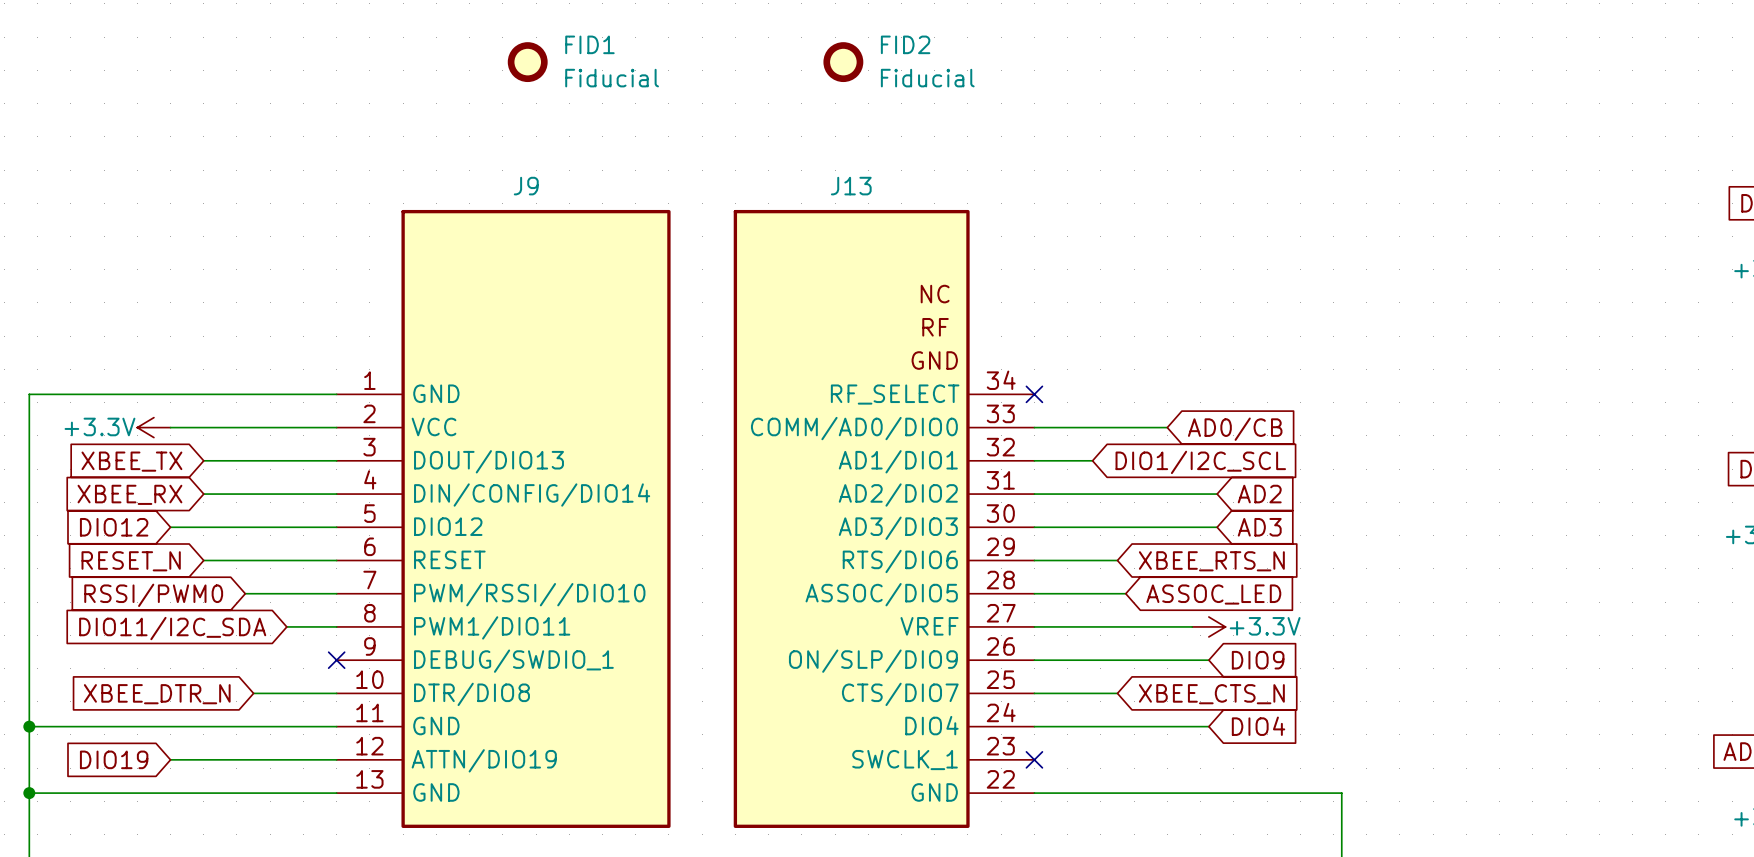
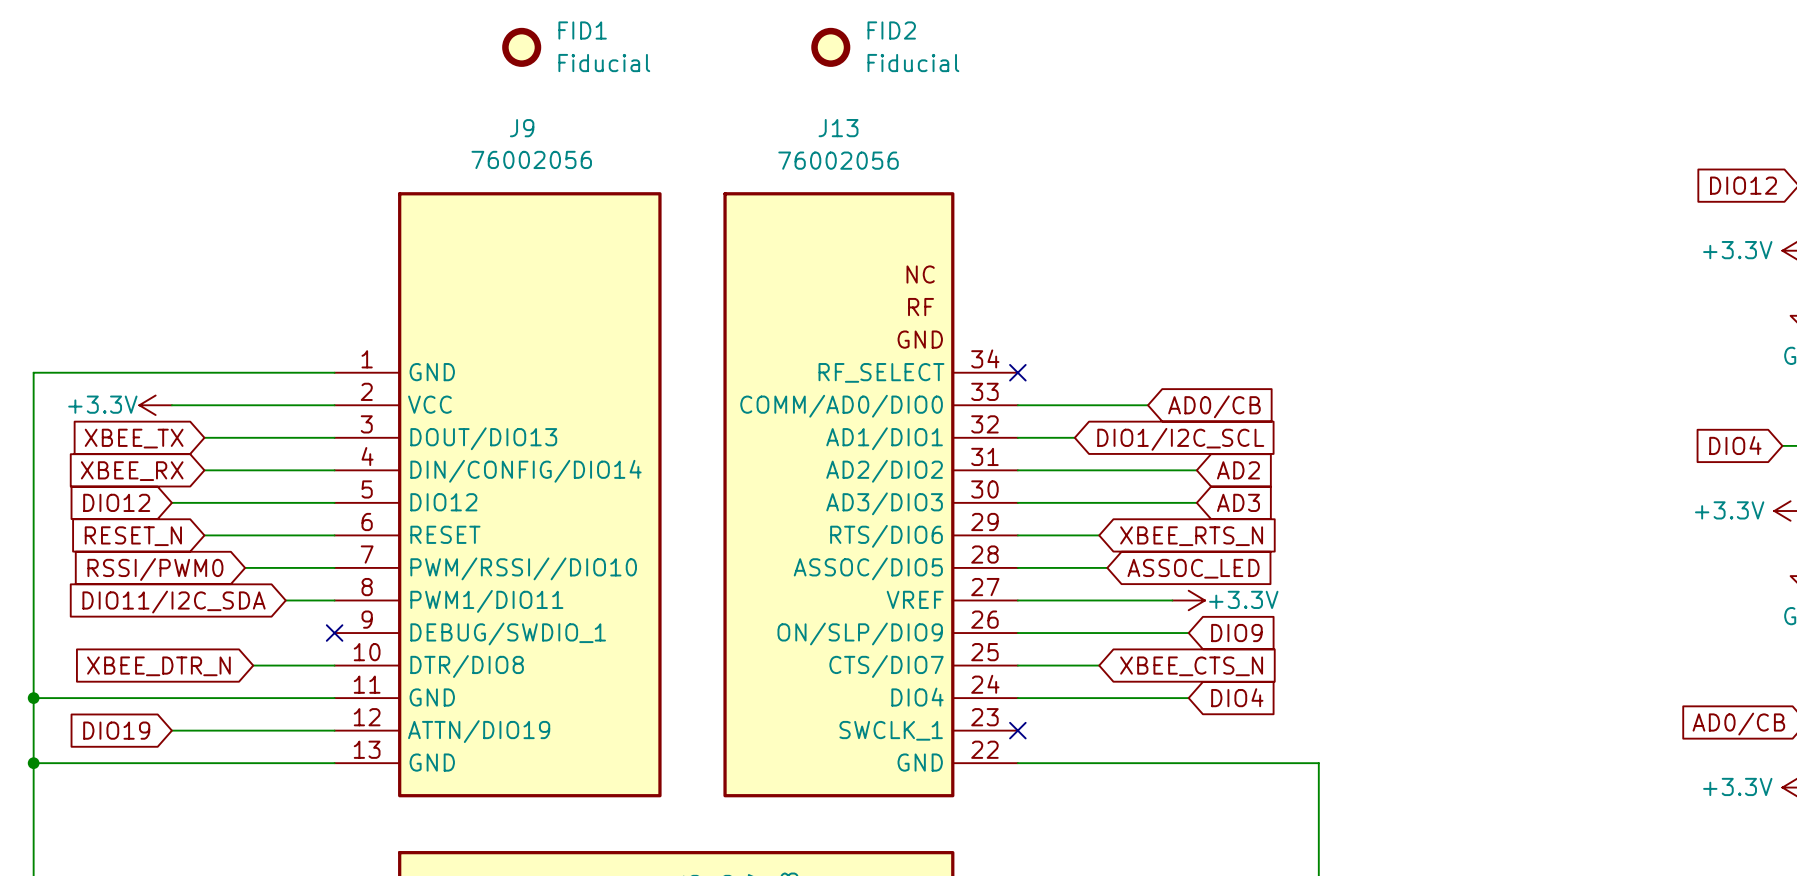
J9 value: none -> 76002056 (531, 159)
J13 value: none -> 76002056 (838, 160)
J9 name position: J9 (526, 186) -> J9 (522, 128)
J13 name position: J13 (851, 186) -> J13 (838, 128)

